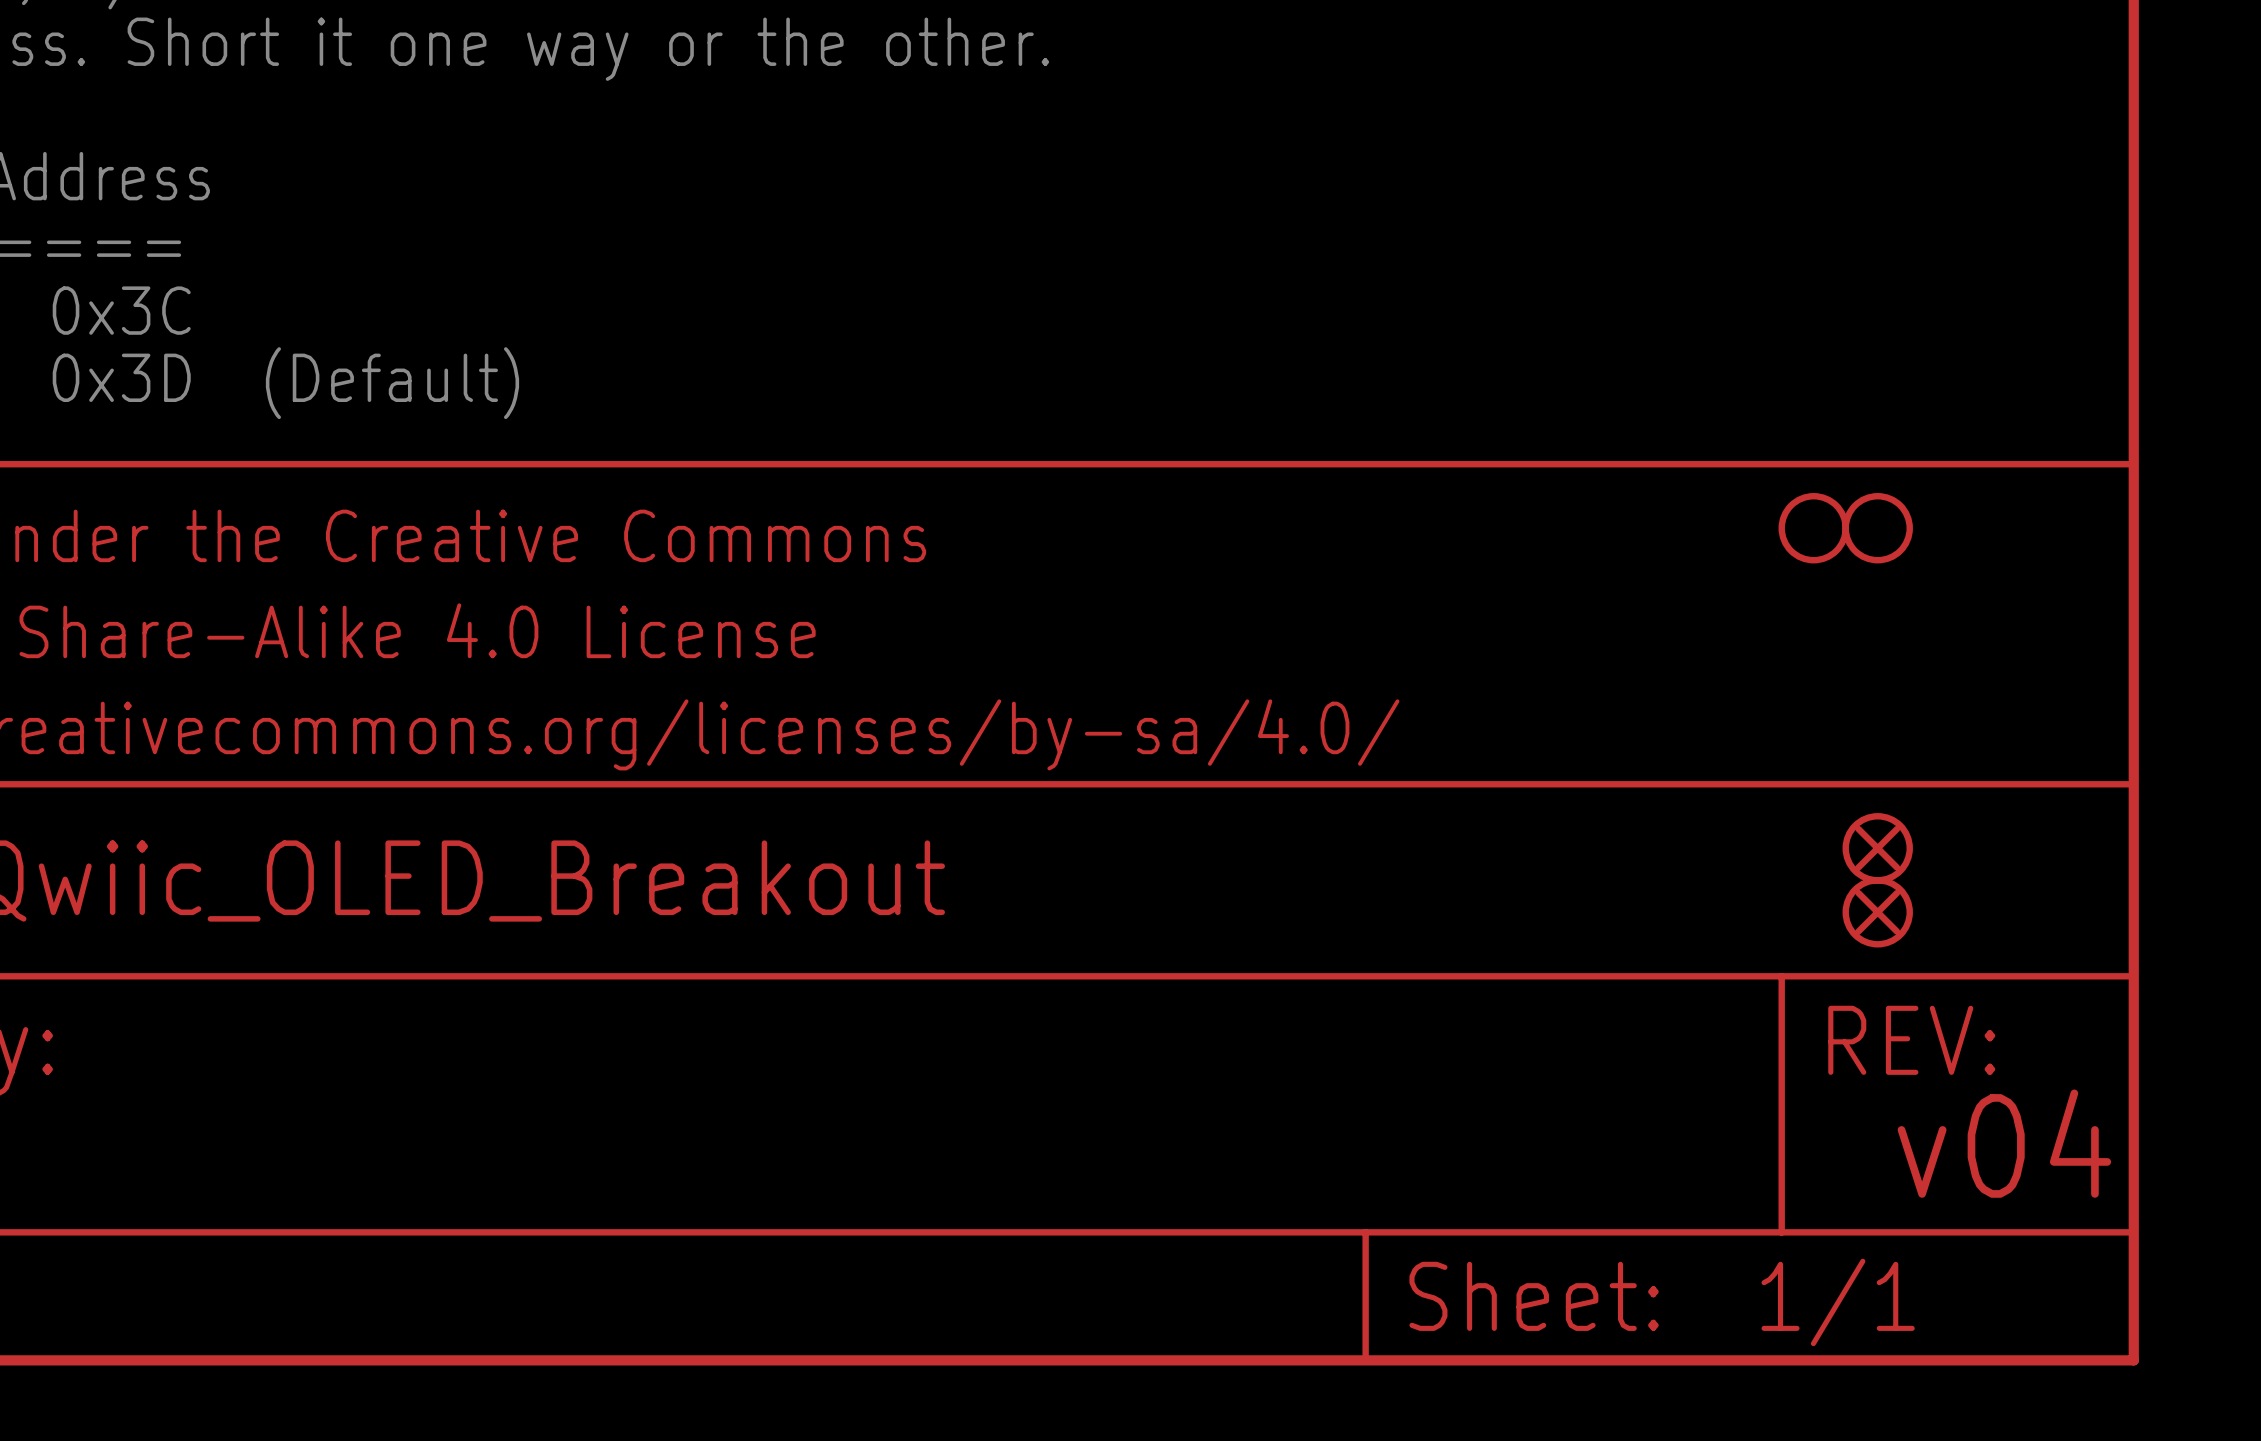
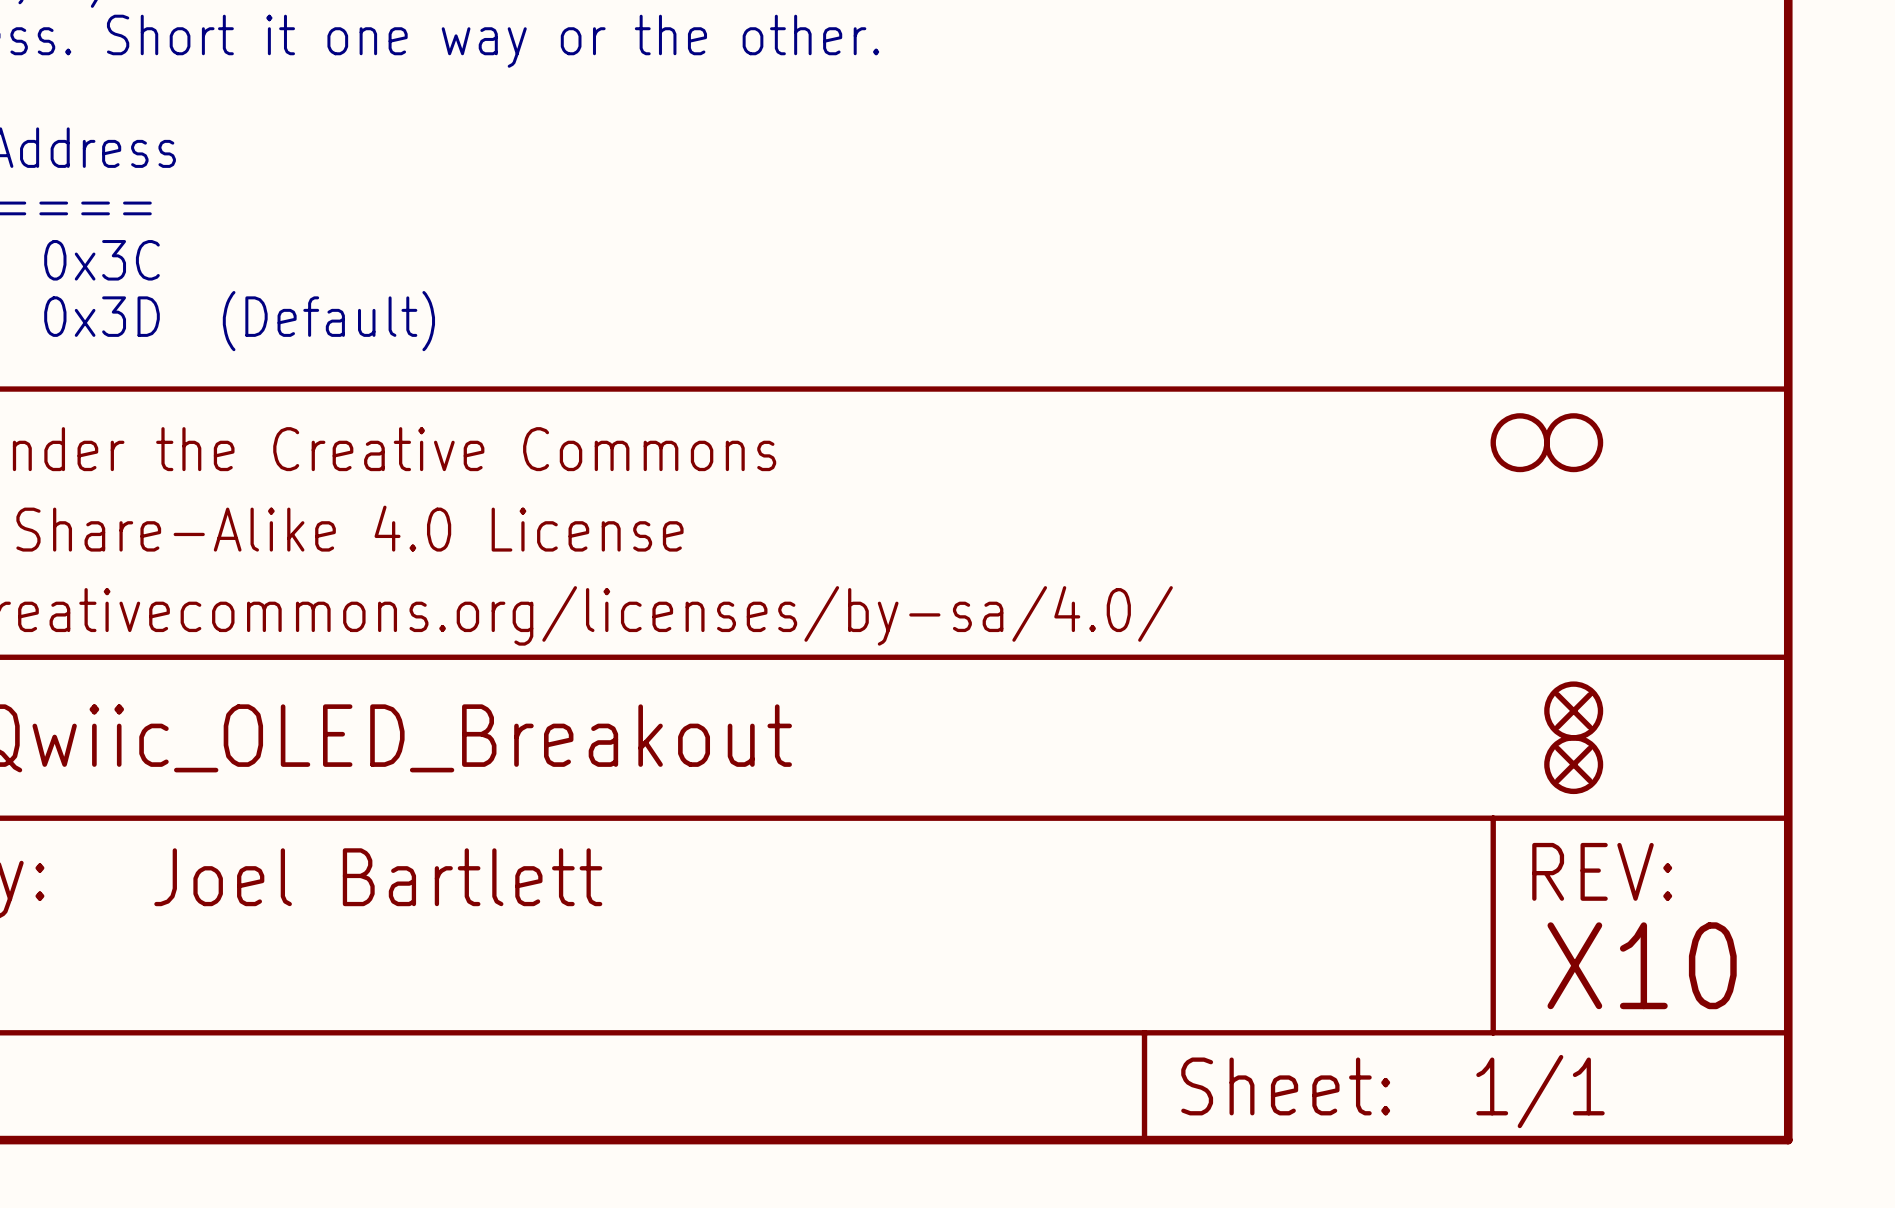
text: none -> Joel Bartlett (378, 877)
text: v04 (2004, 1143) -> none
text: none -> X10 (1642, 965)

